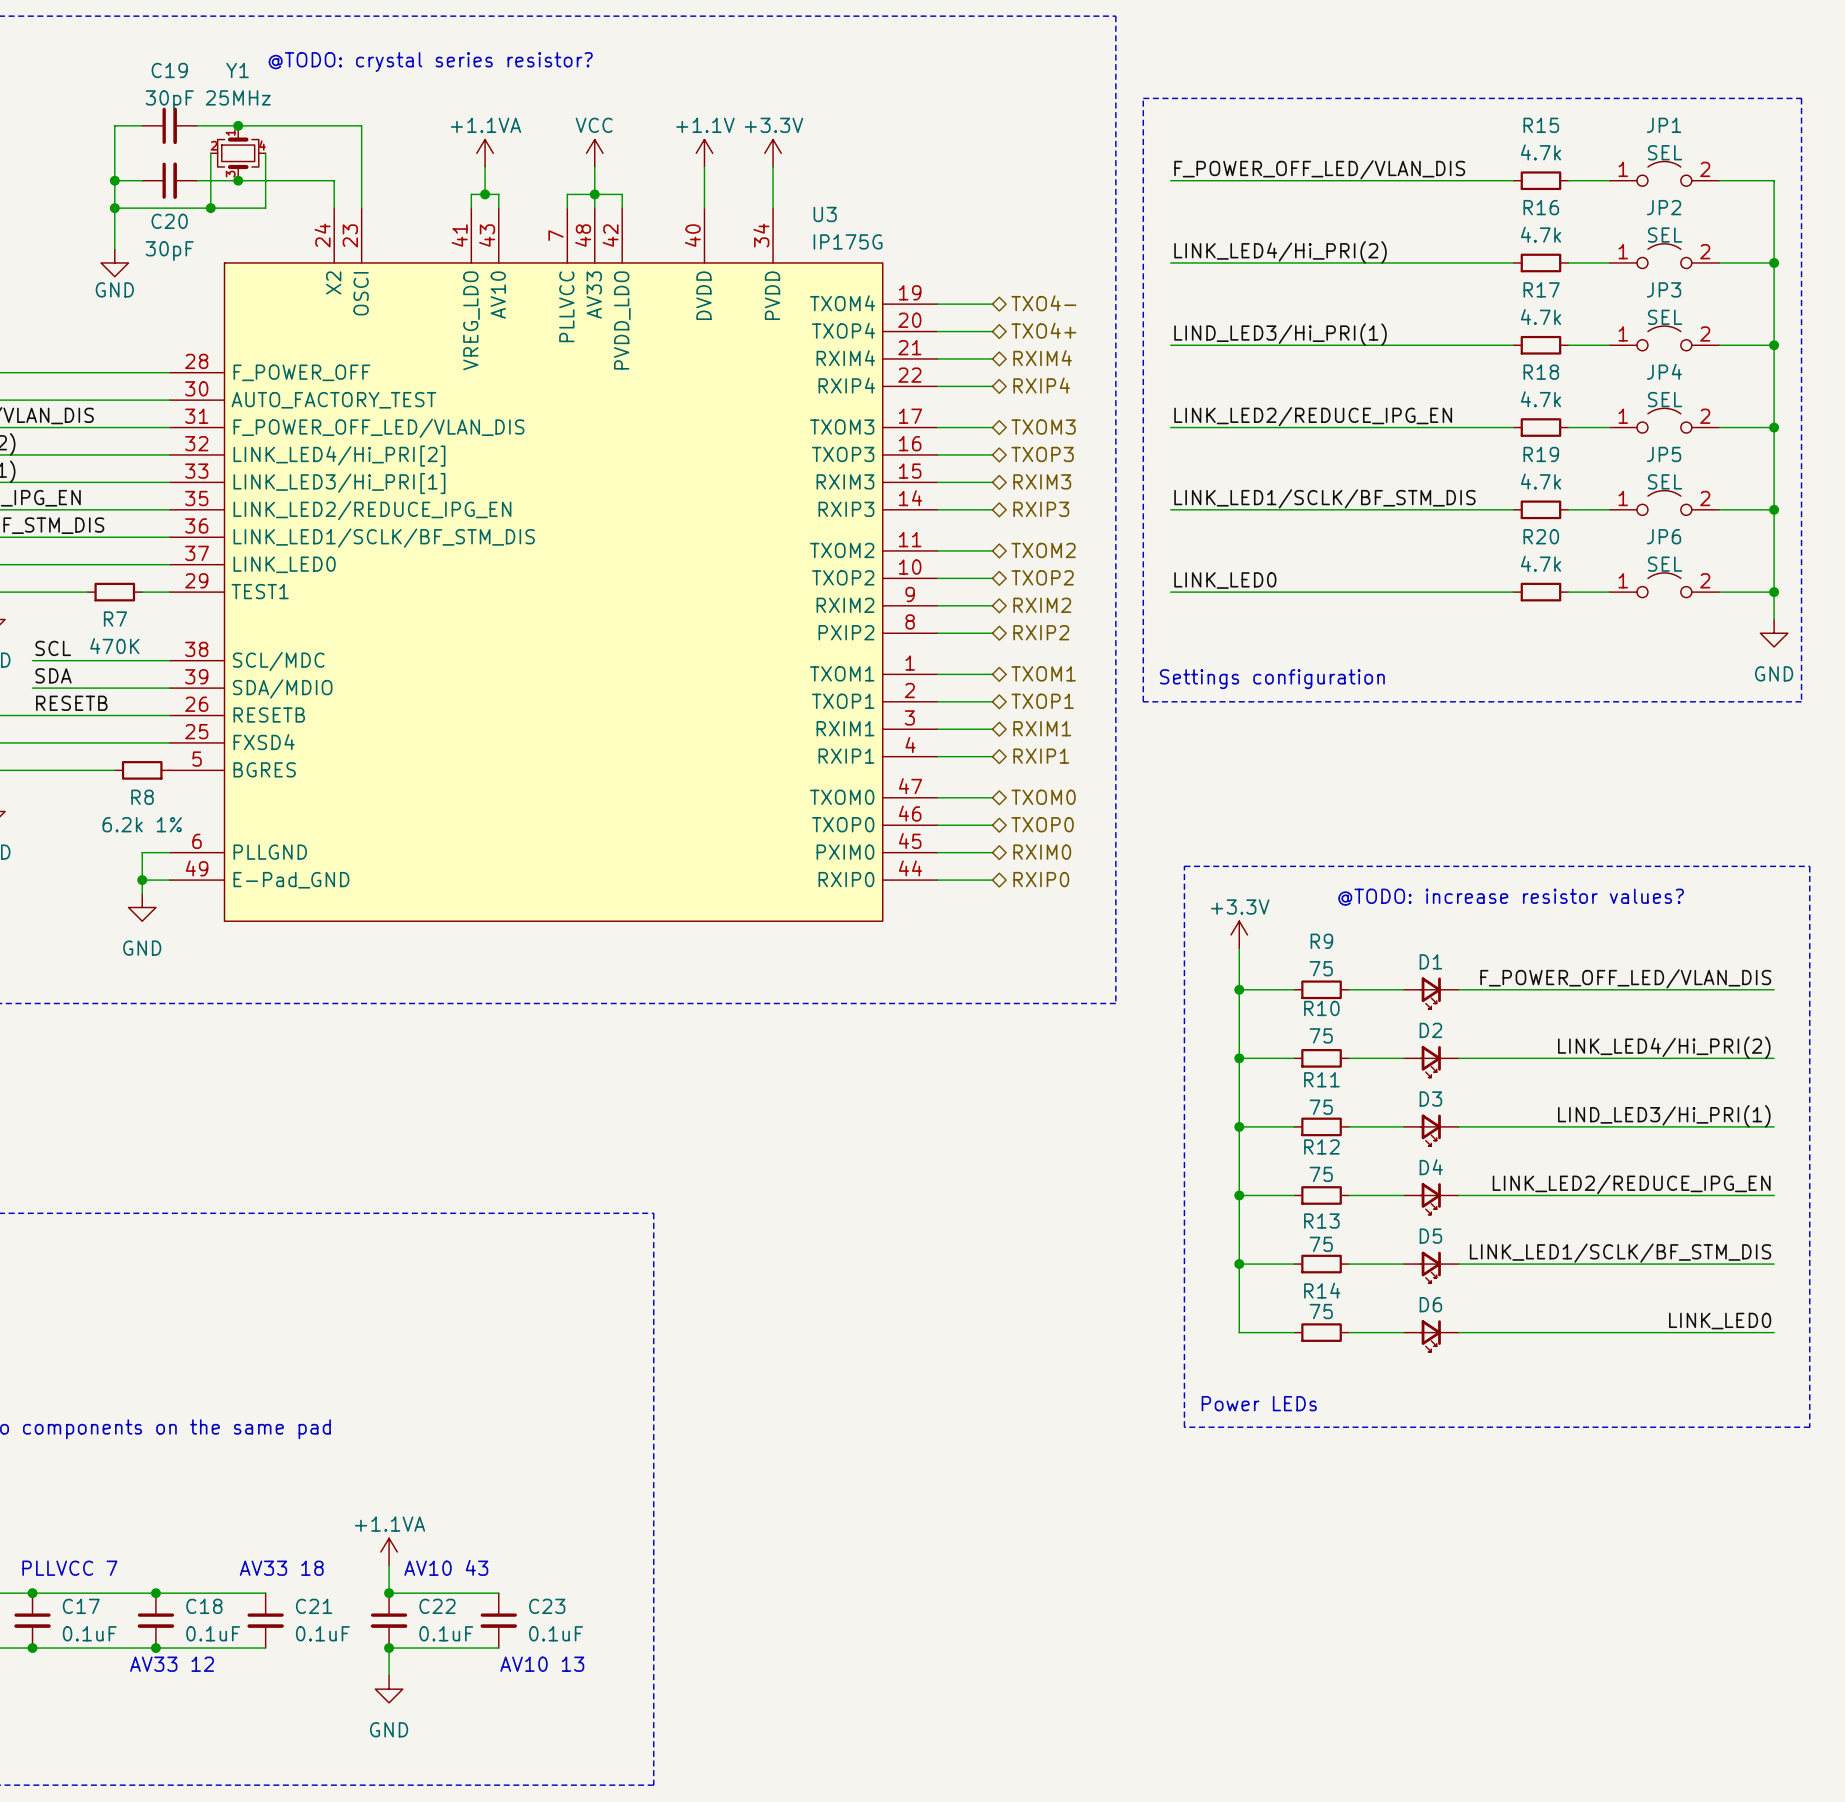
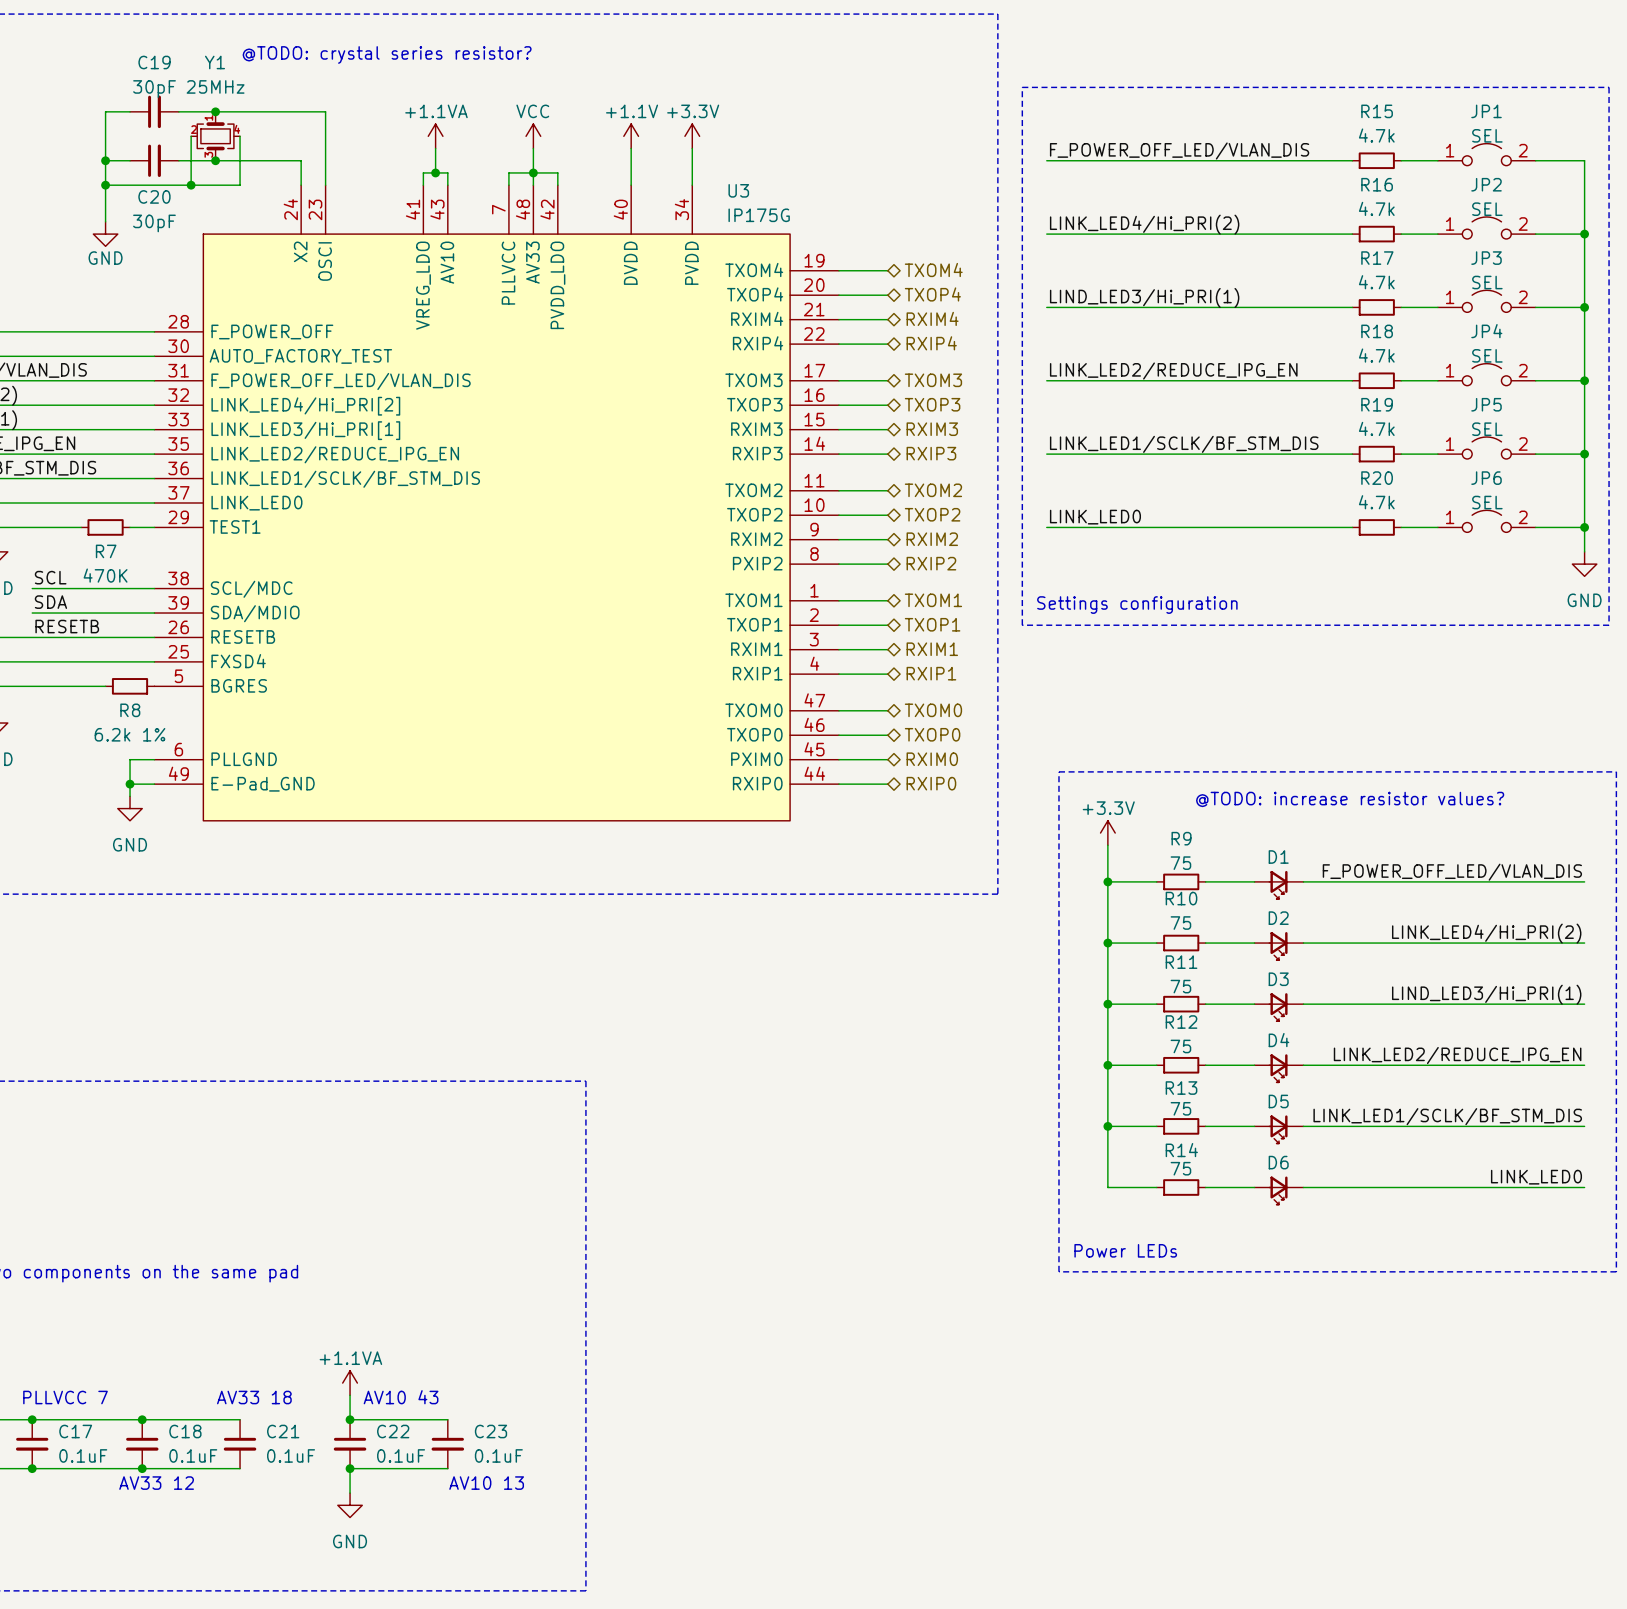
hierarchical label: TXO4- (1043, 303) -> TXOM4 (933, 270)
hierarchical label: TXO4+ (1043, 330) -> TXOP4 (932, 294)

